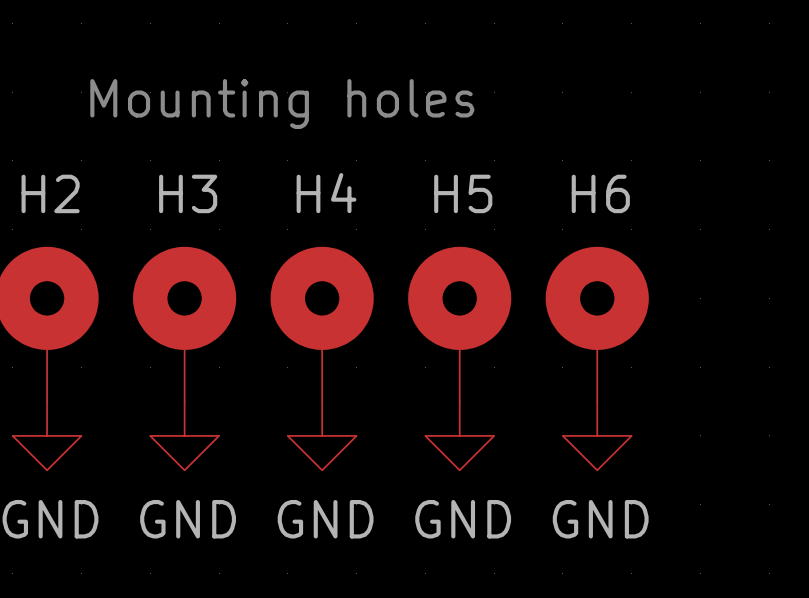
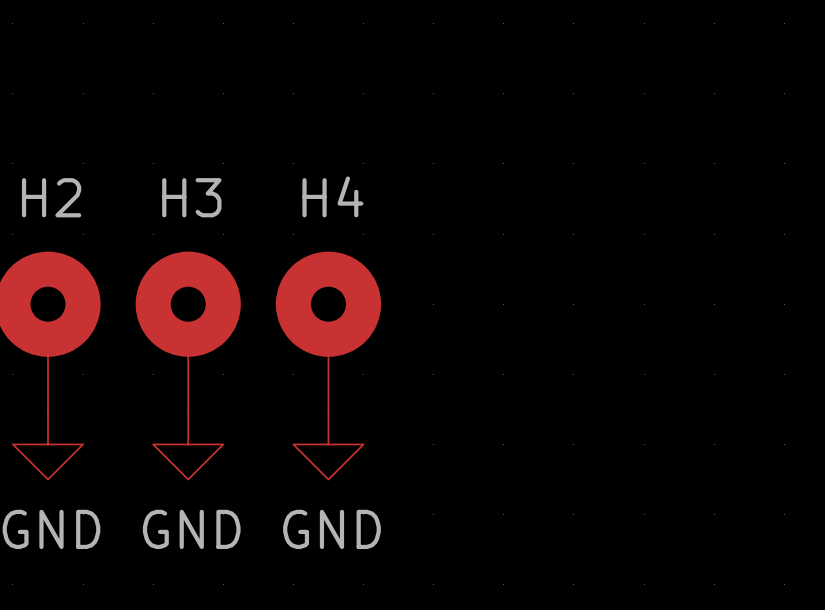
text: Mounting holes (282, 104) -> none
H5: (459, 324) -> none
H6: (597, 324) -> none
power symbol: GND (459, 435) -> none
power symbol: GND (597, 435) -> none

